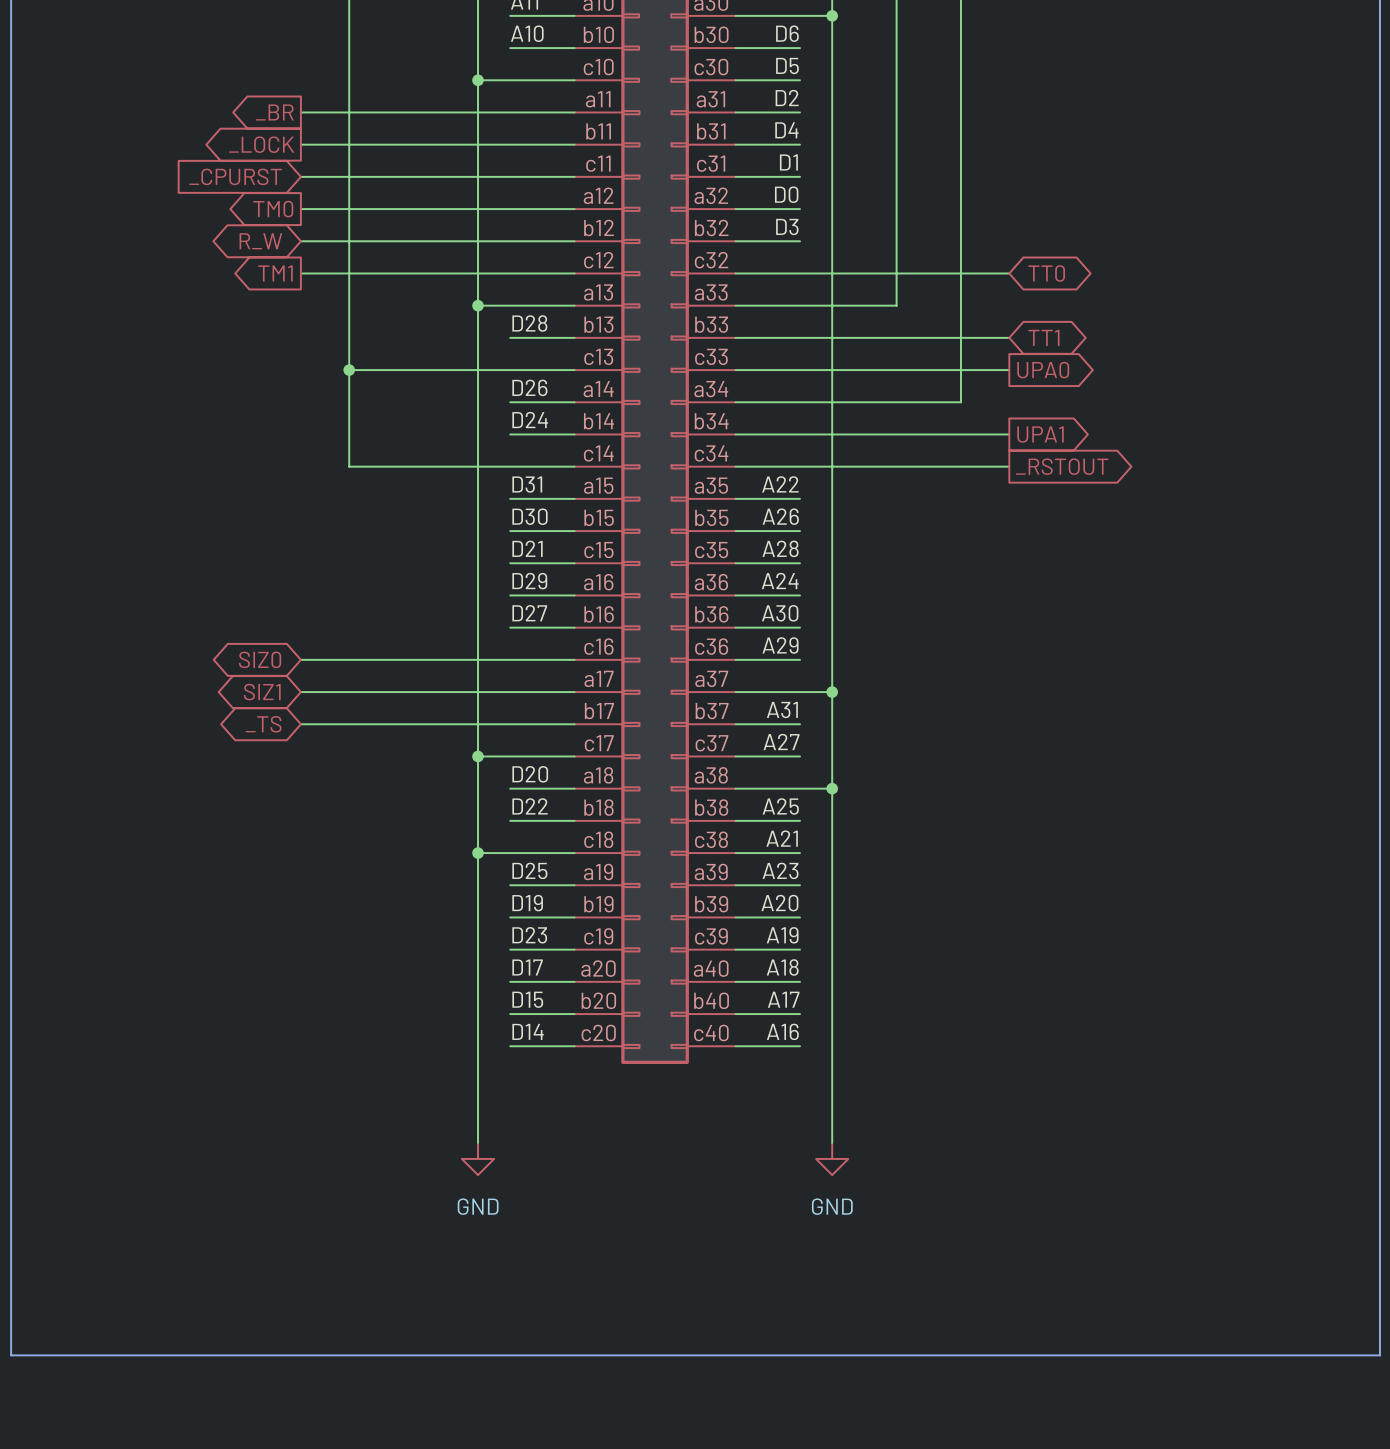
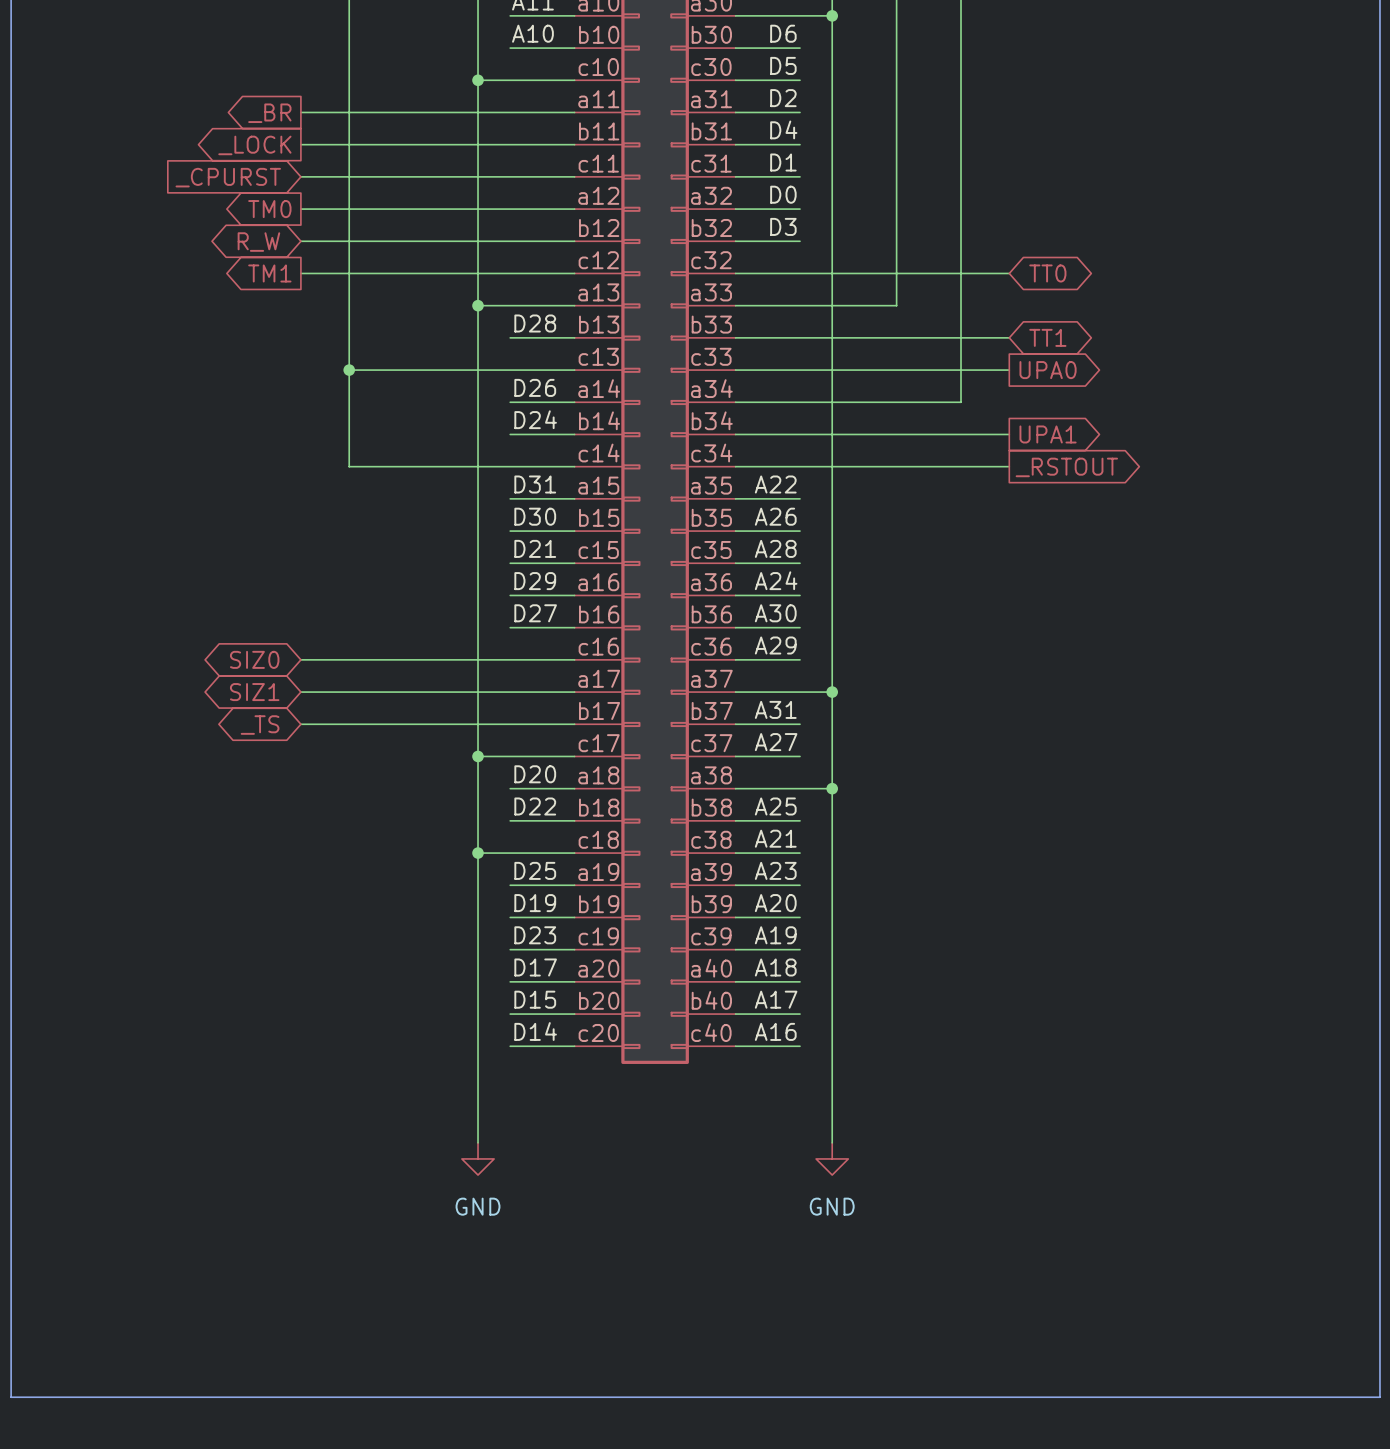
line: (11, 1355) (1379, 1355) -> (11, 1355) (11, 1397) (1379, 1397) (1379, 1355)

